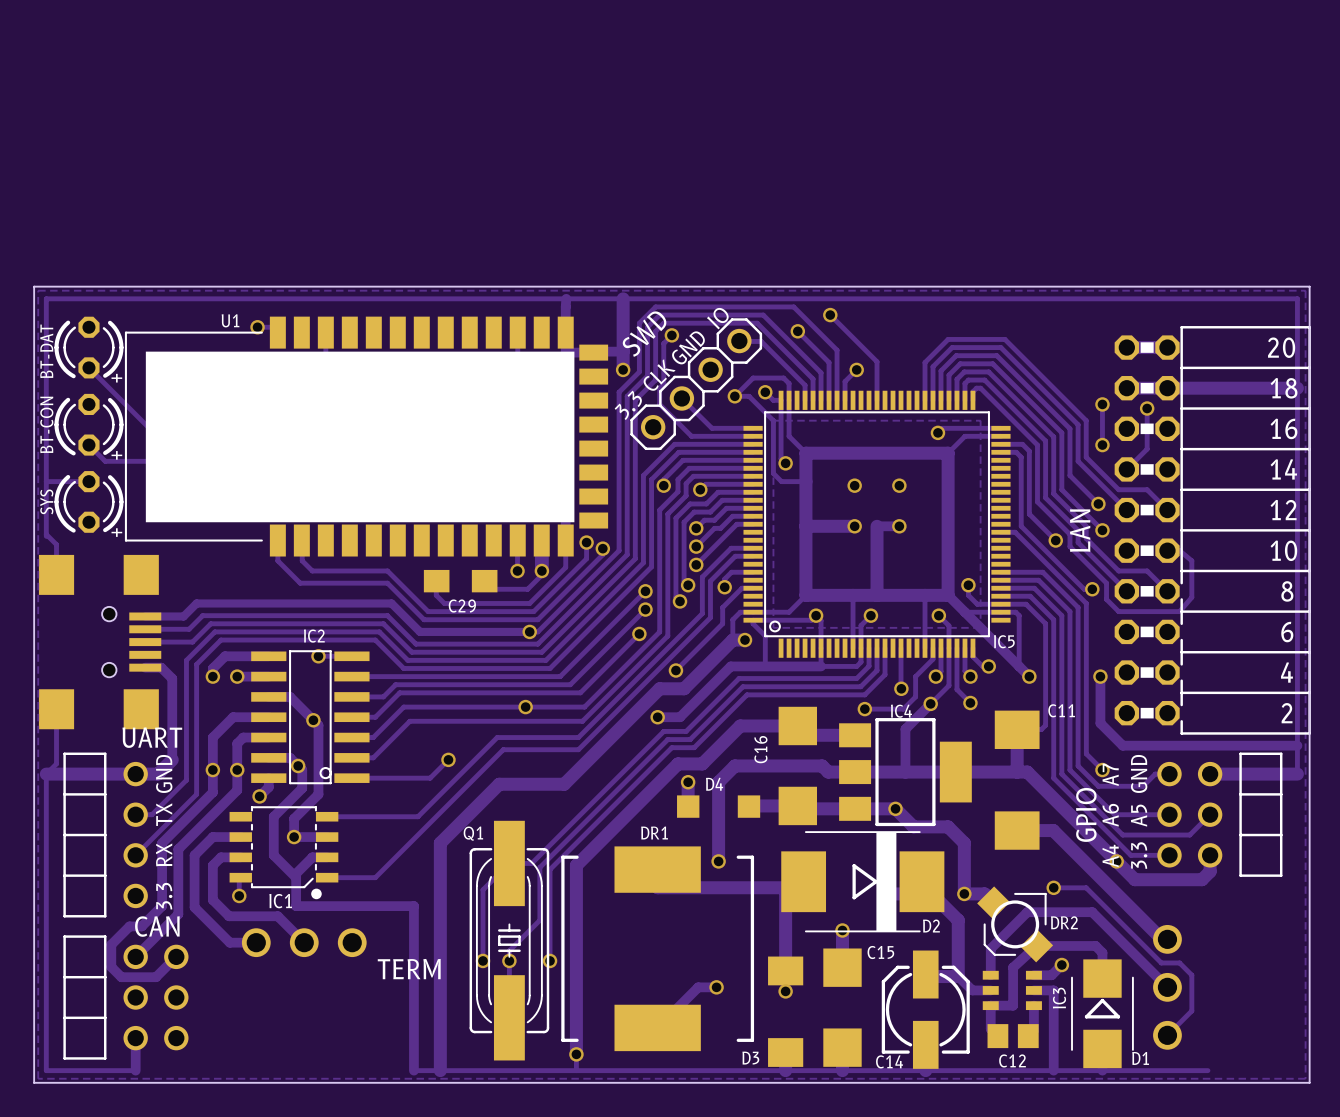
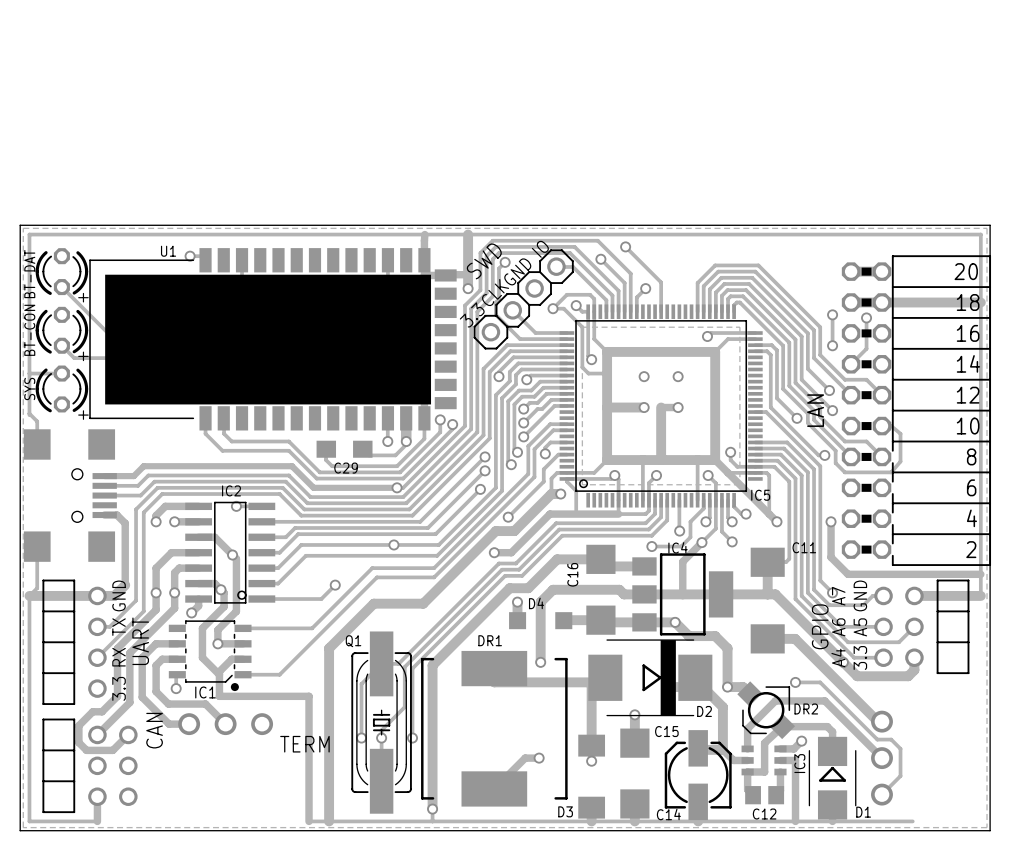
part value rotation: 0° (152, 737) -> 90° counterclockwise (140, 641)
part value position: UART (152, 737) -> UART (140, 641)
part value rotation: 0° (157, 926) -> 90° counterclockwise (154, 730)

